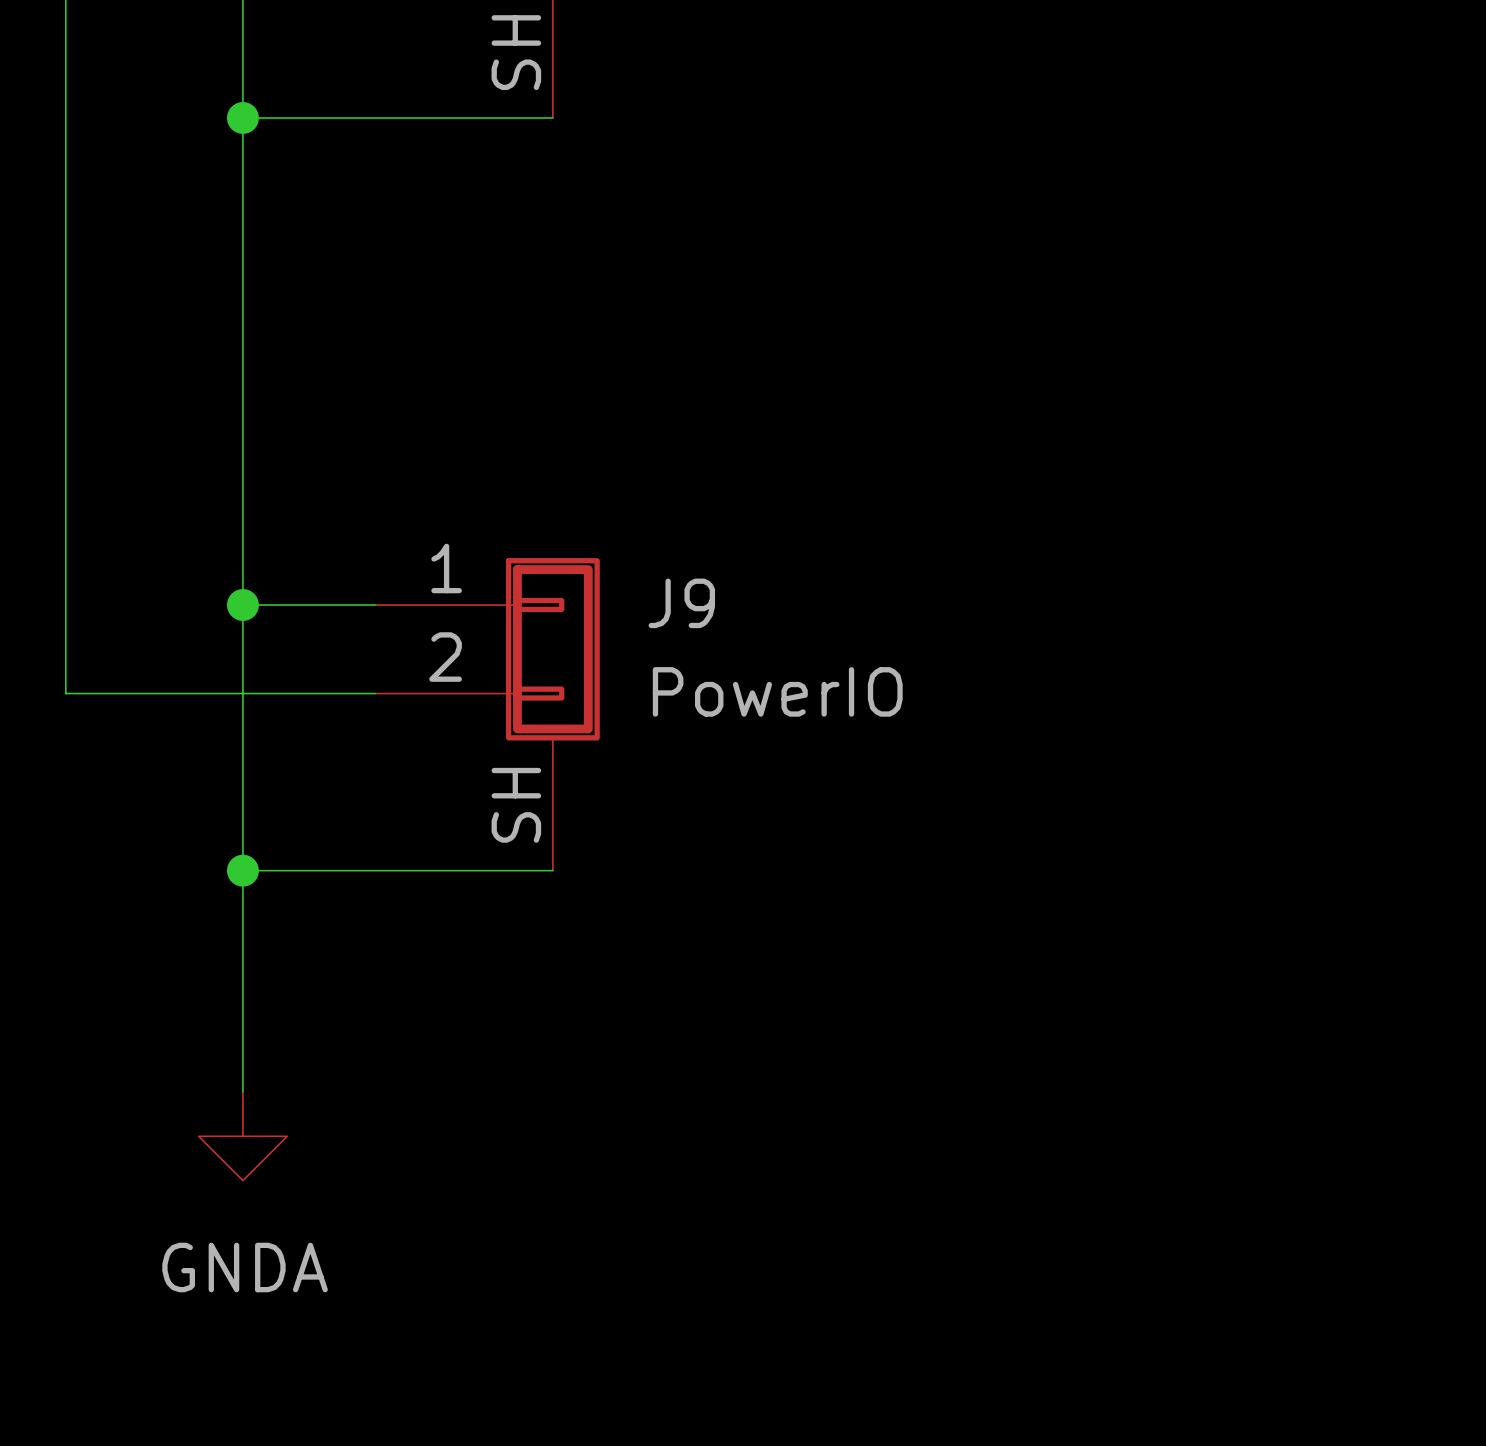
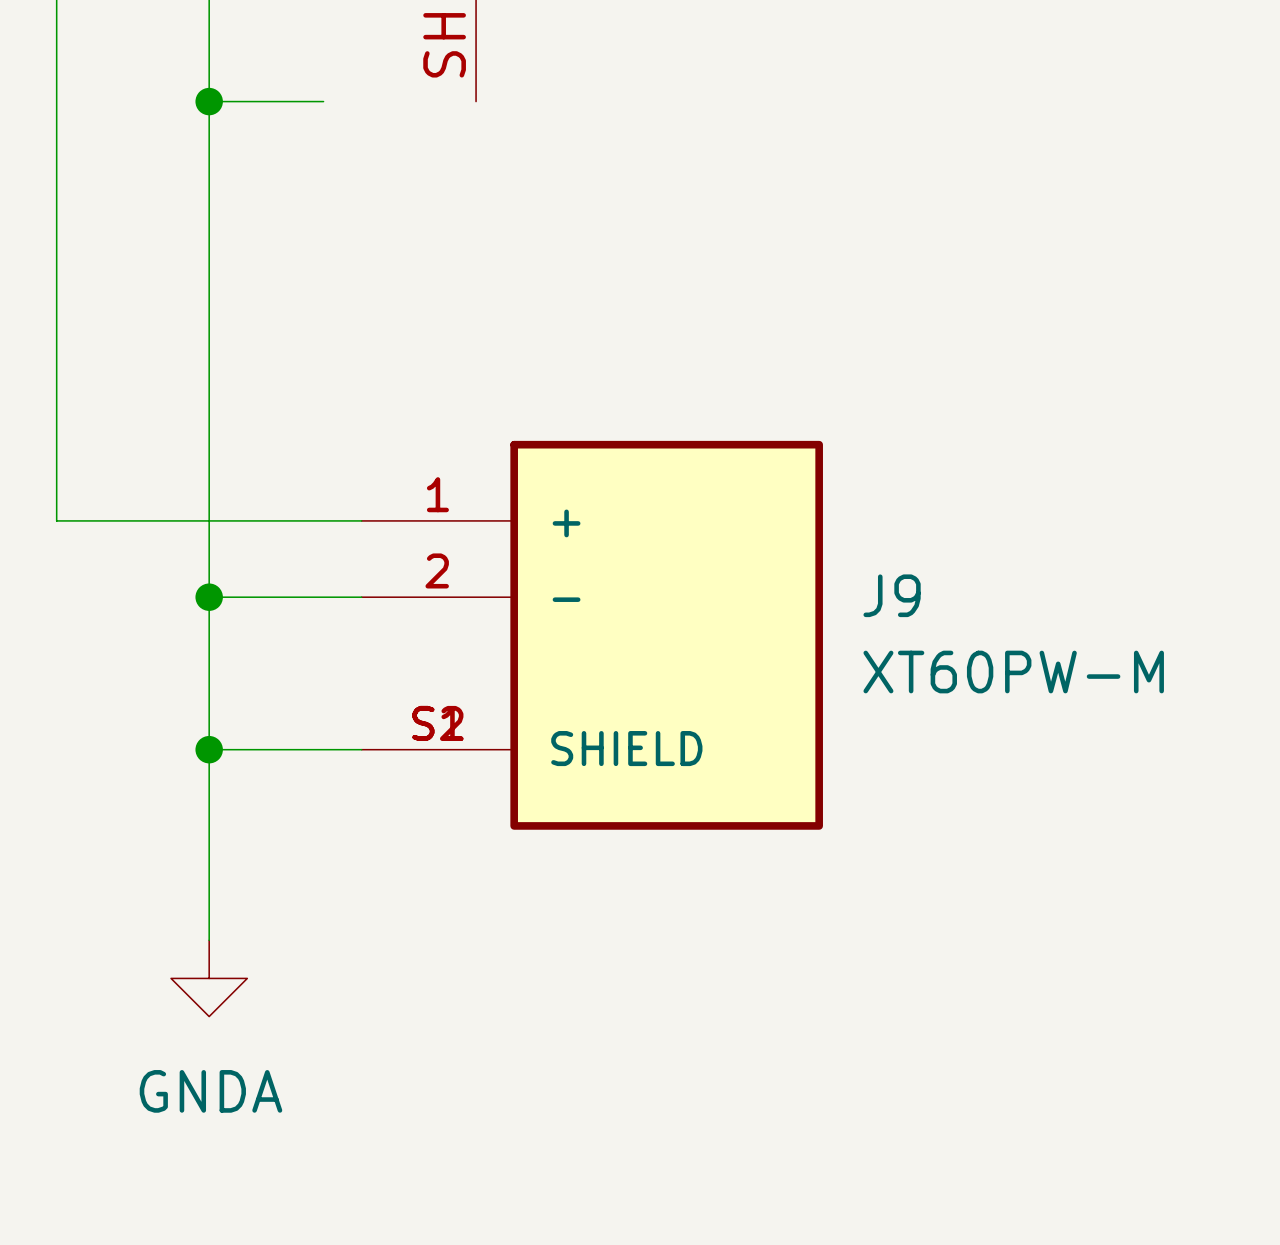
wire: (375, 117) (552, 117) -> none
J9 symbol: [375, 558, 600, 871] -> [361, 440, 823, 830]
J9 name position: J9 (681, 603) -> J9 (892, 595)
wire: (65, 605) (65, 693) (242, 693) -> (56, 520) (209, 520)
junction position: (242, 605) -> (209, 597)
J9 value: PowerIO (777, 691) -> XT60PW-M (1013, 672)

